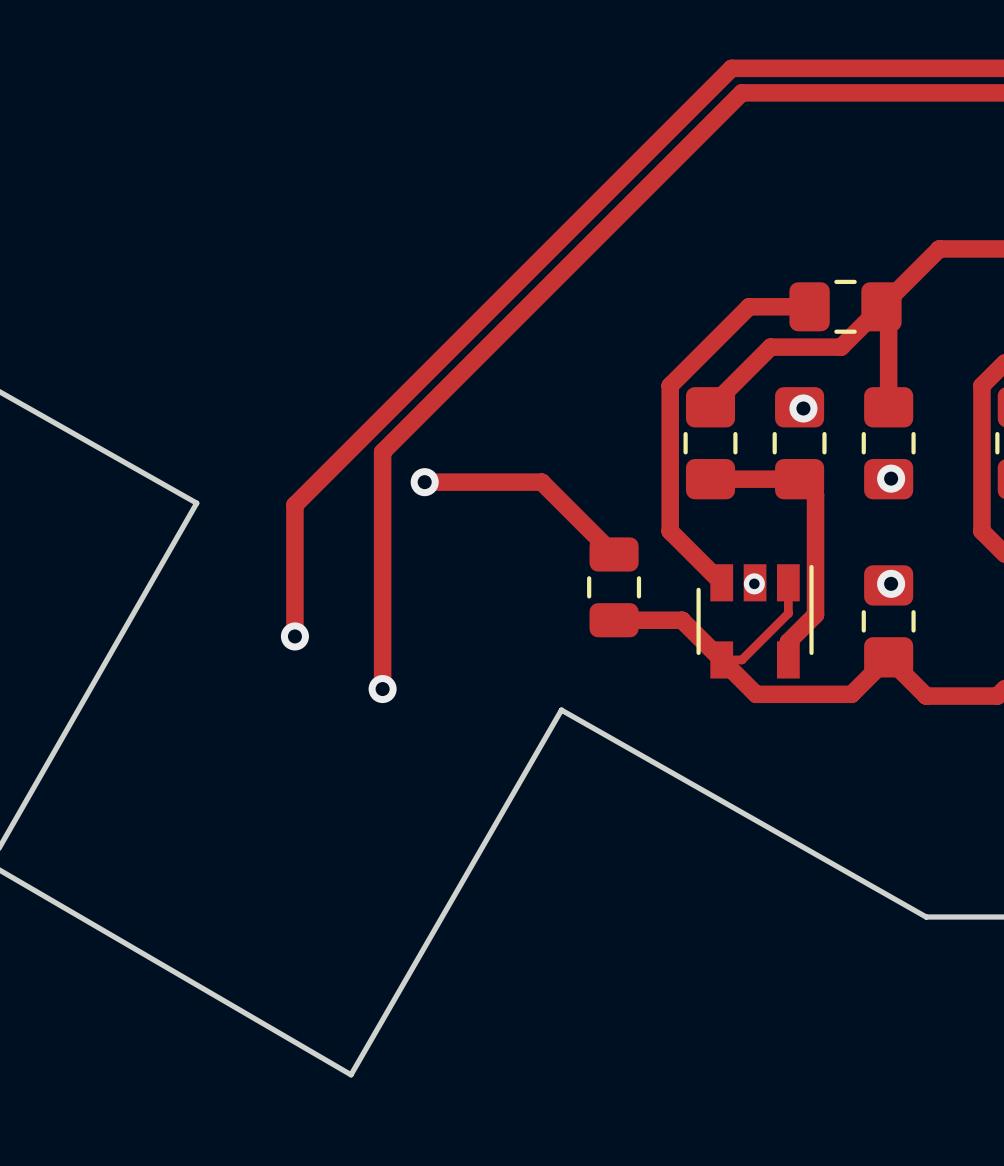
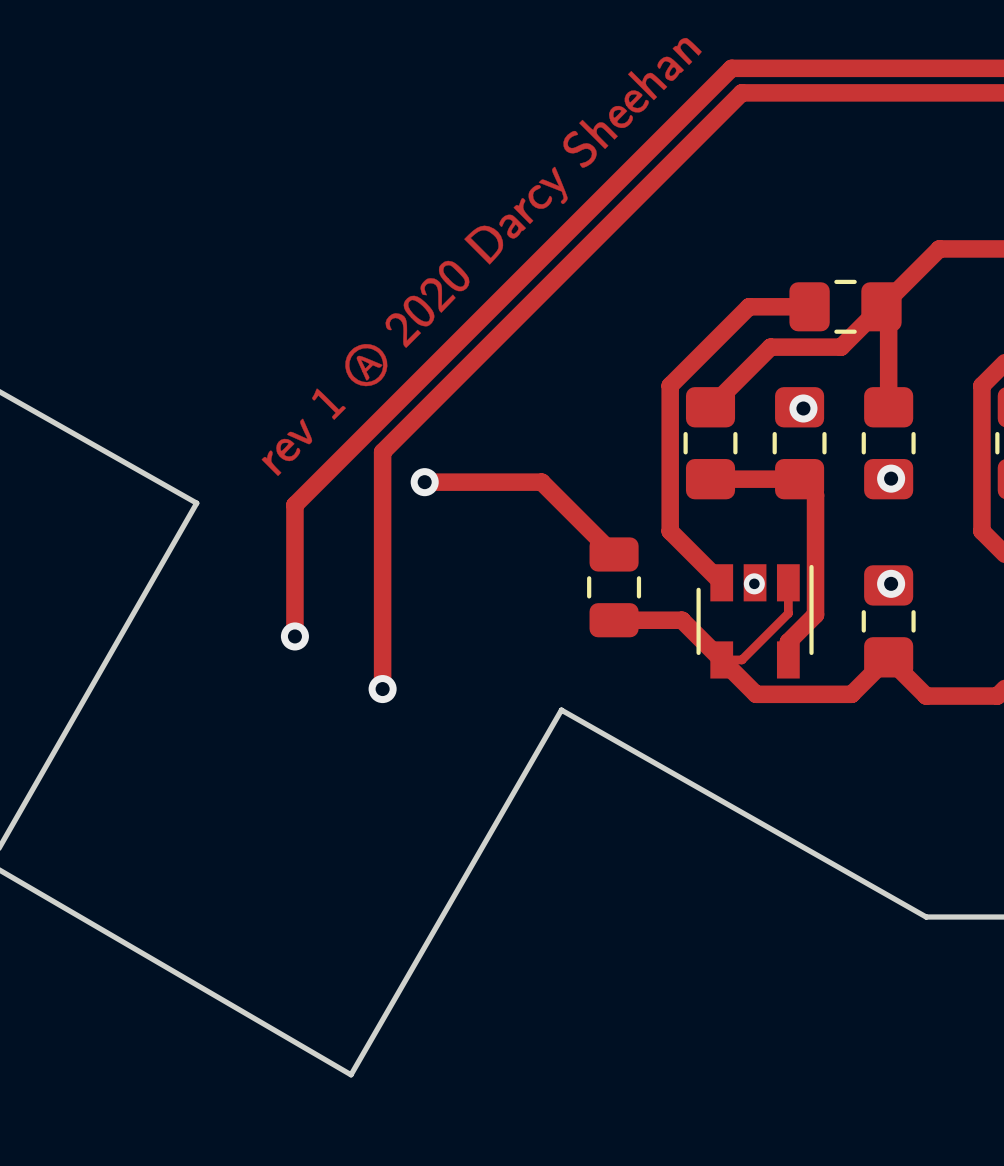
drawing: none -> [261, 37, 702, 477]

